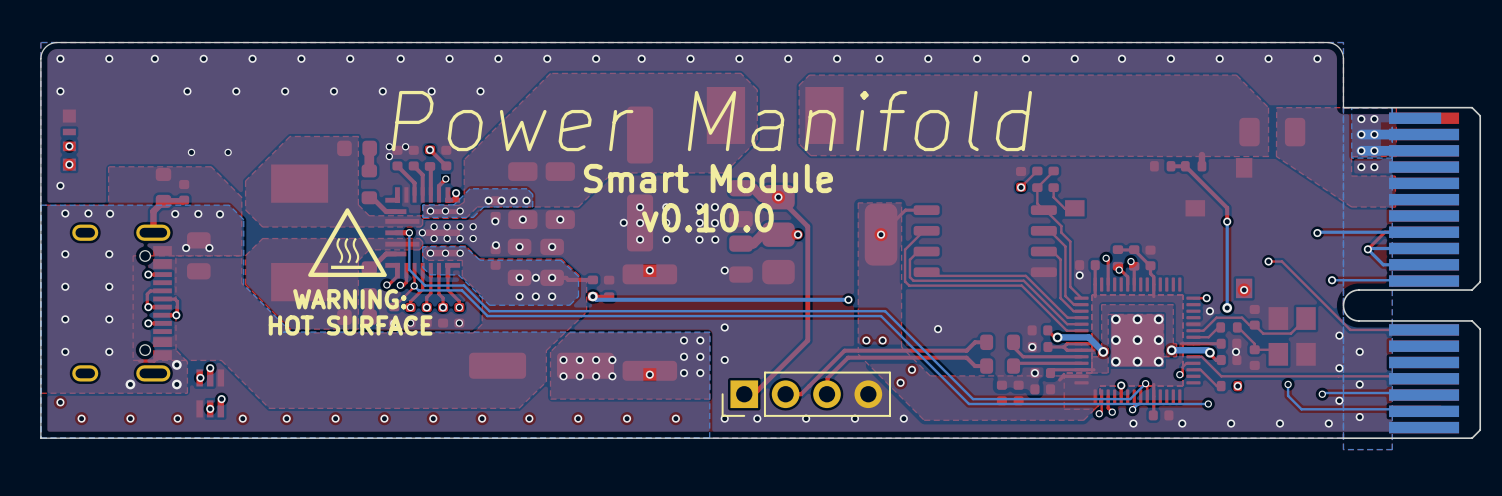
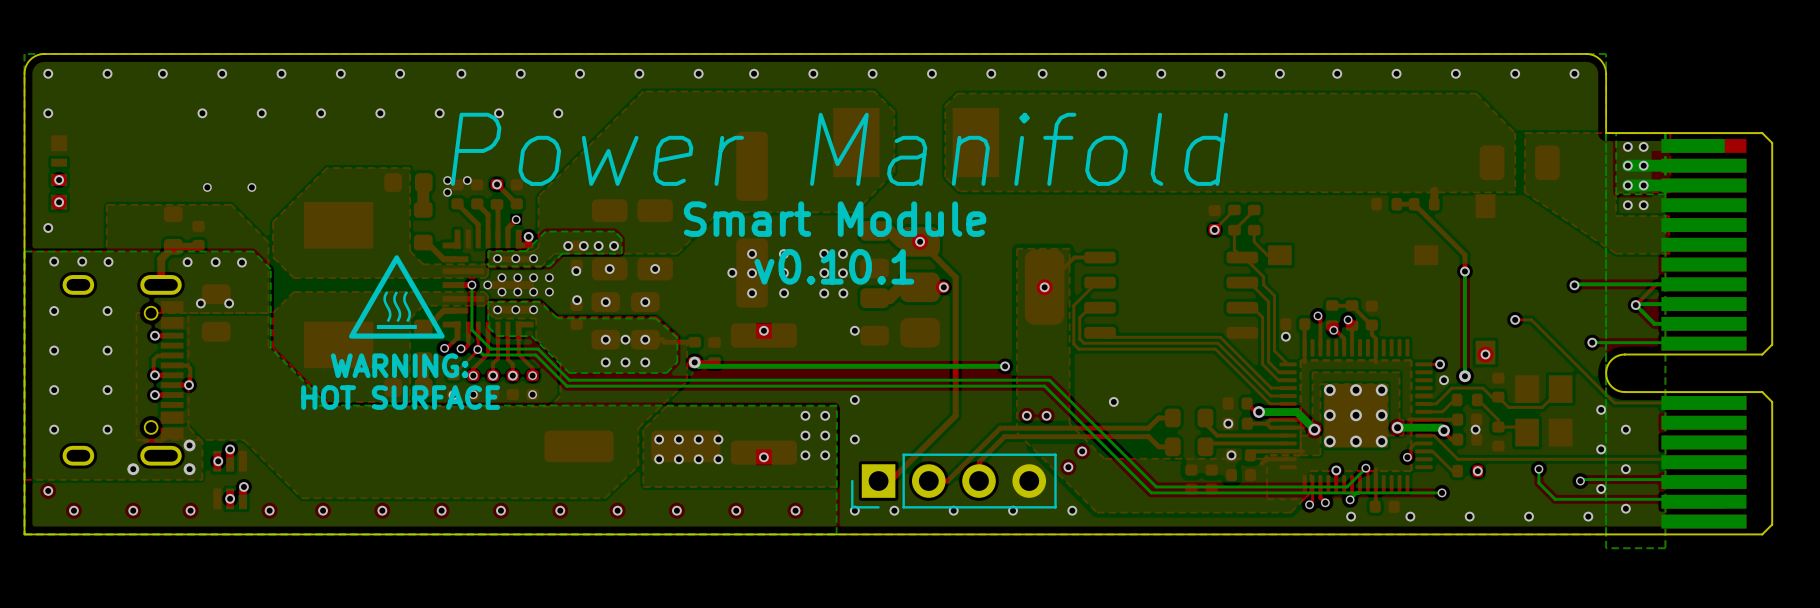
text: v0.10.0 (707, 217) -> v0.10.1 (834, 266)

